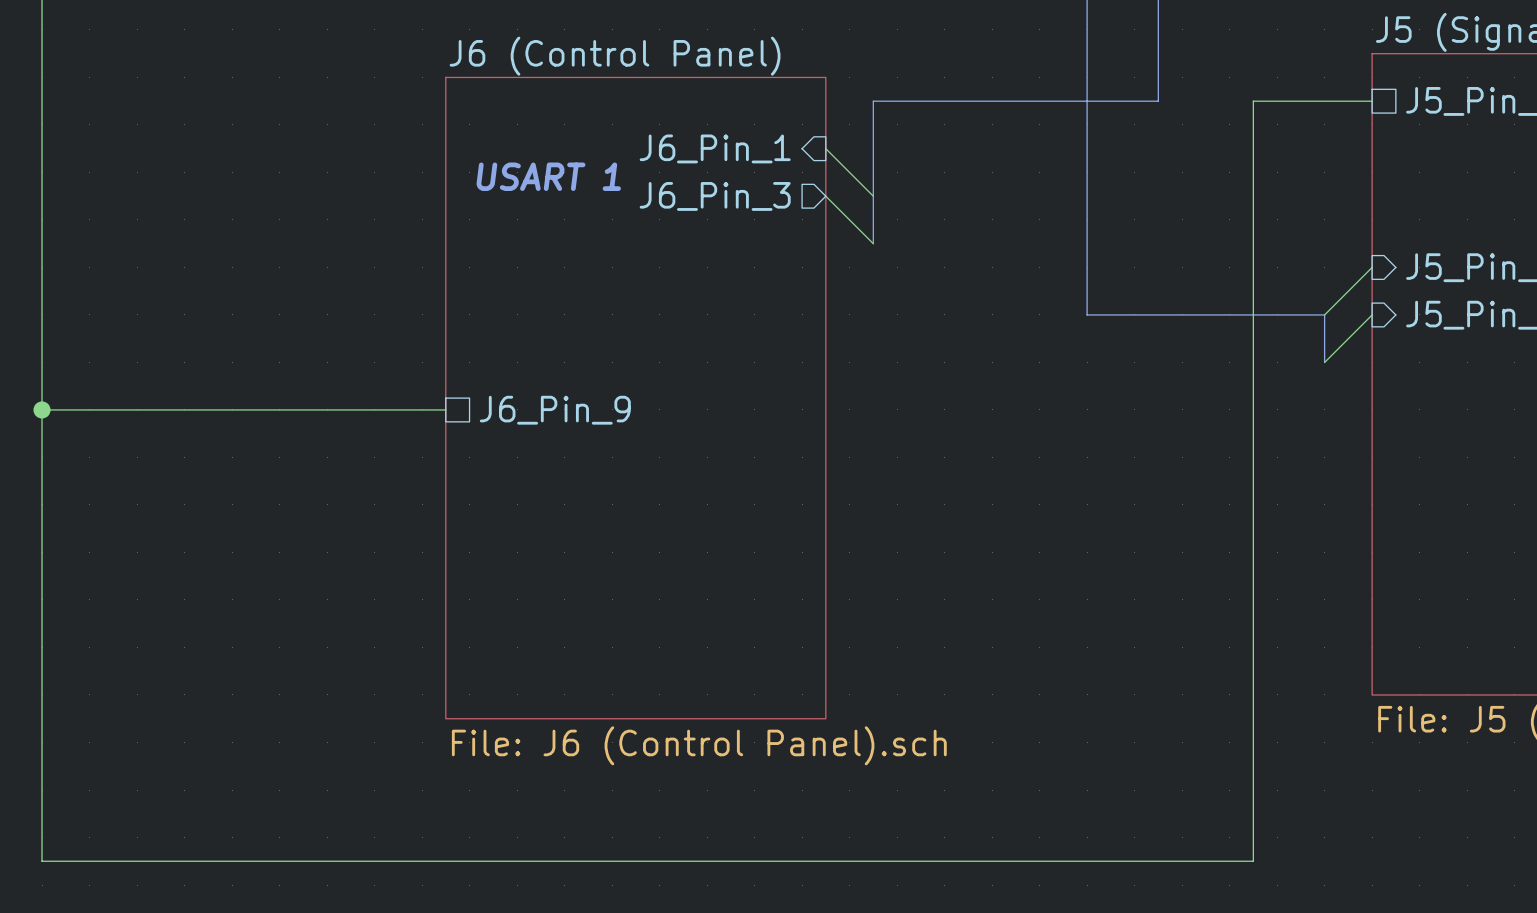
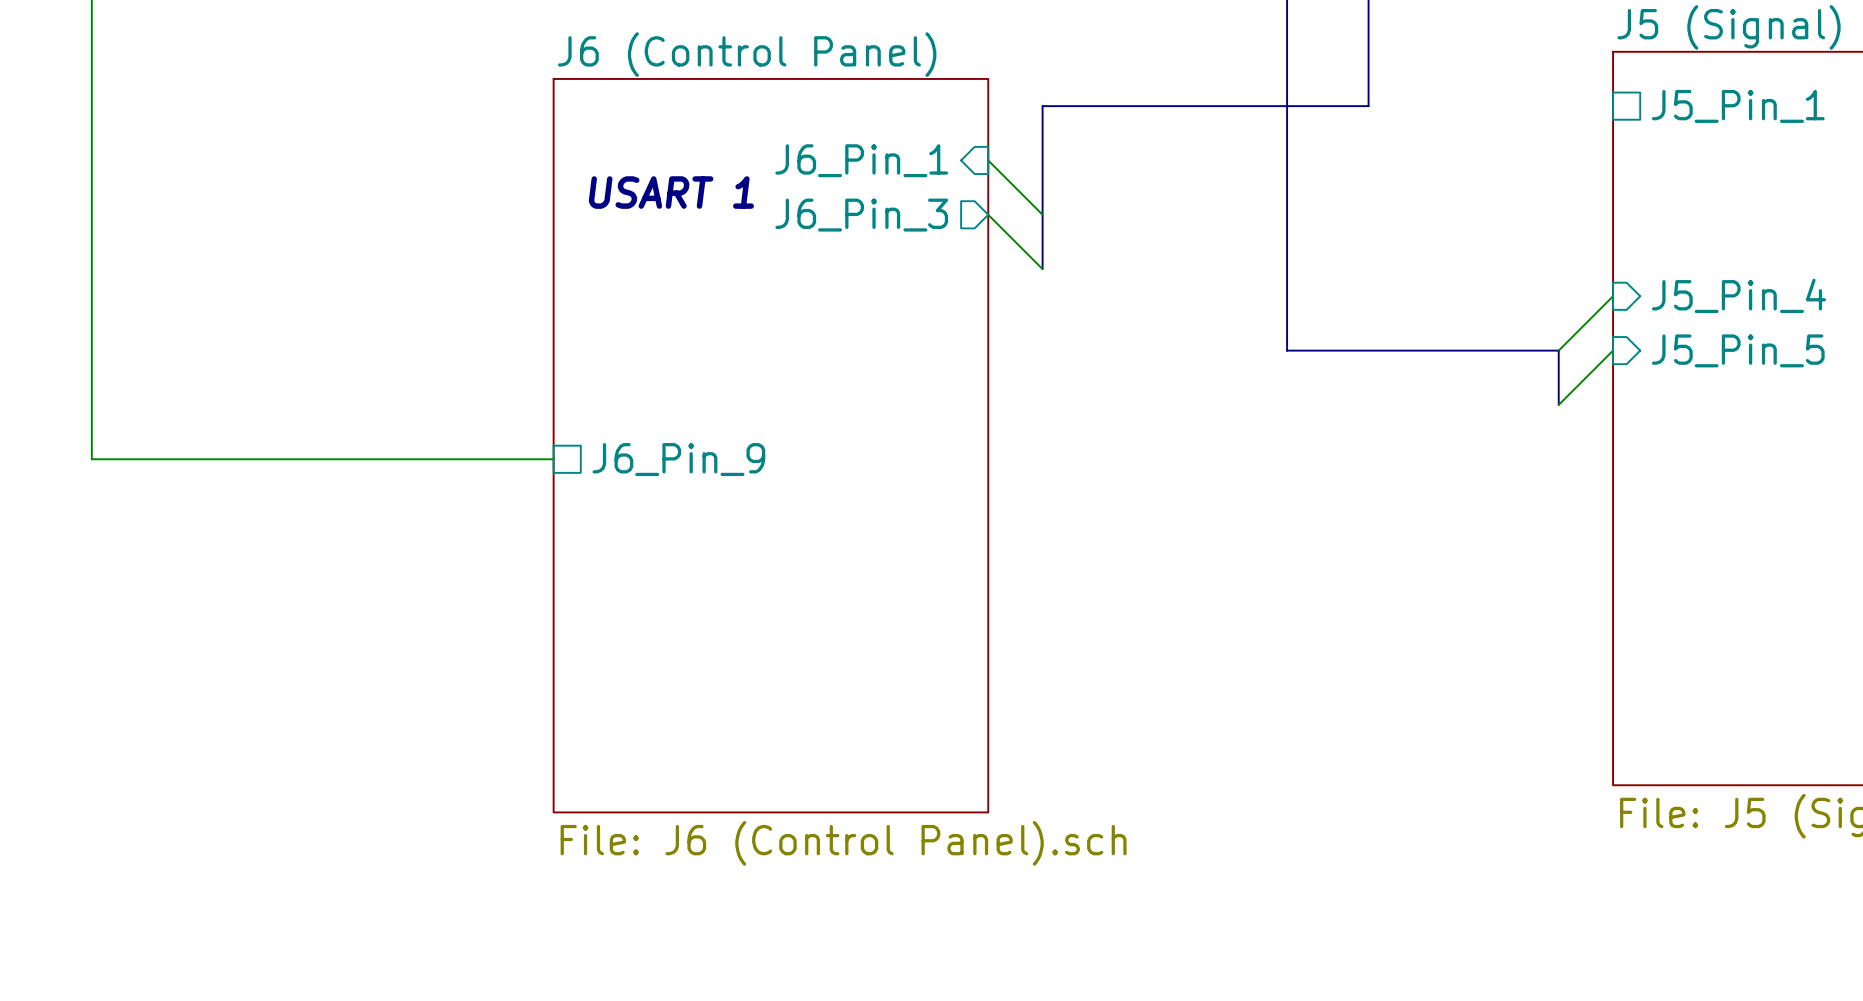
wire: (1372, 101) (1253, 101) (1253, 861) (42, 861) (42, 409) -> none
junction: (42, 409) -> none

